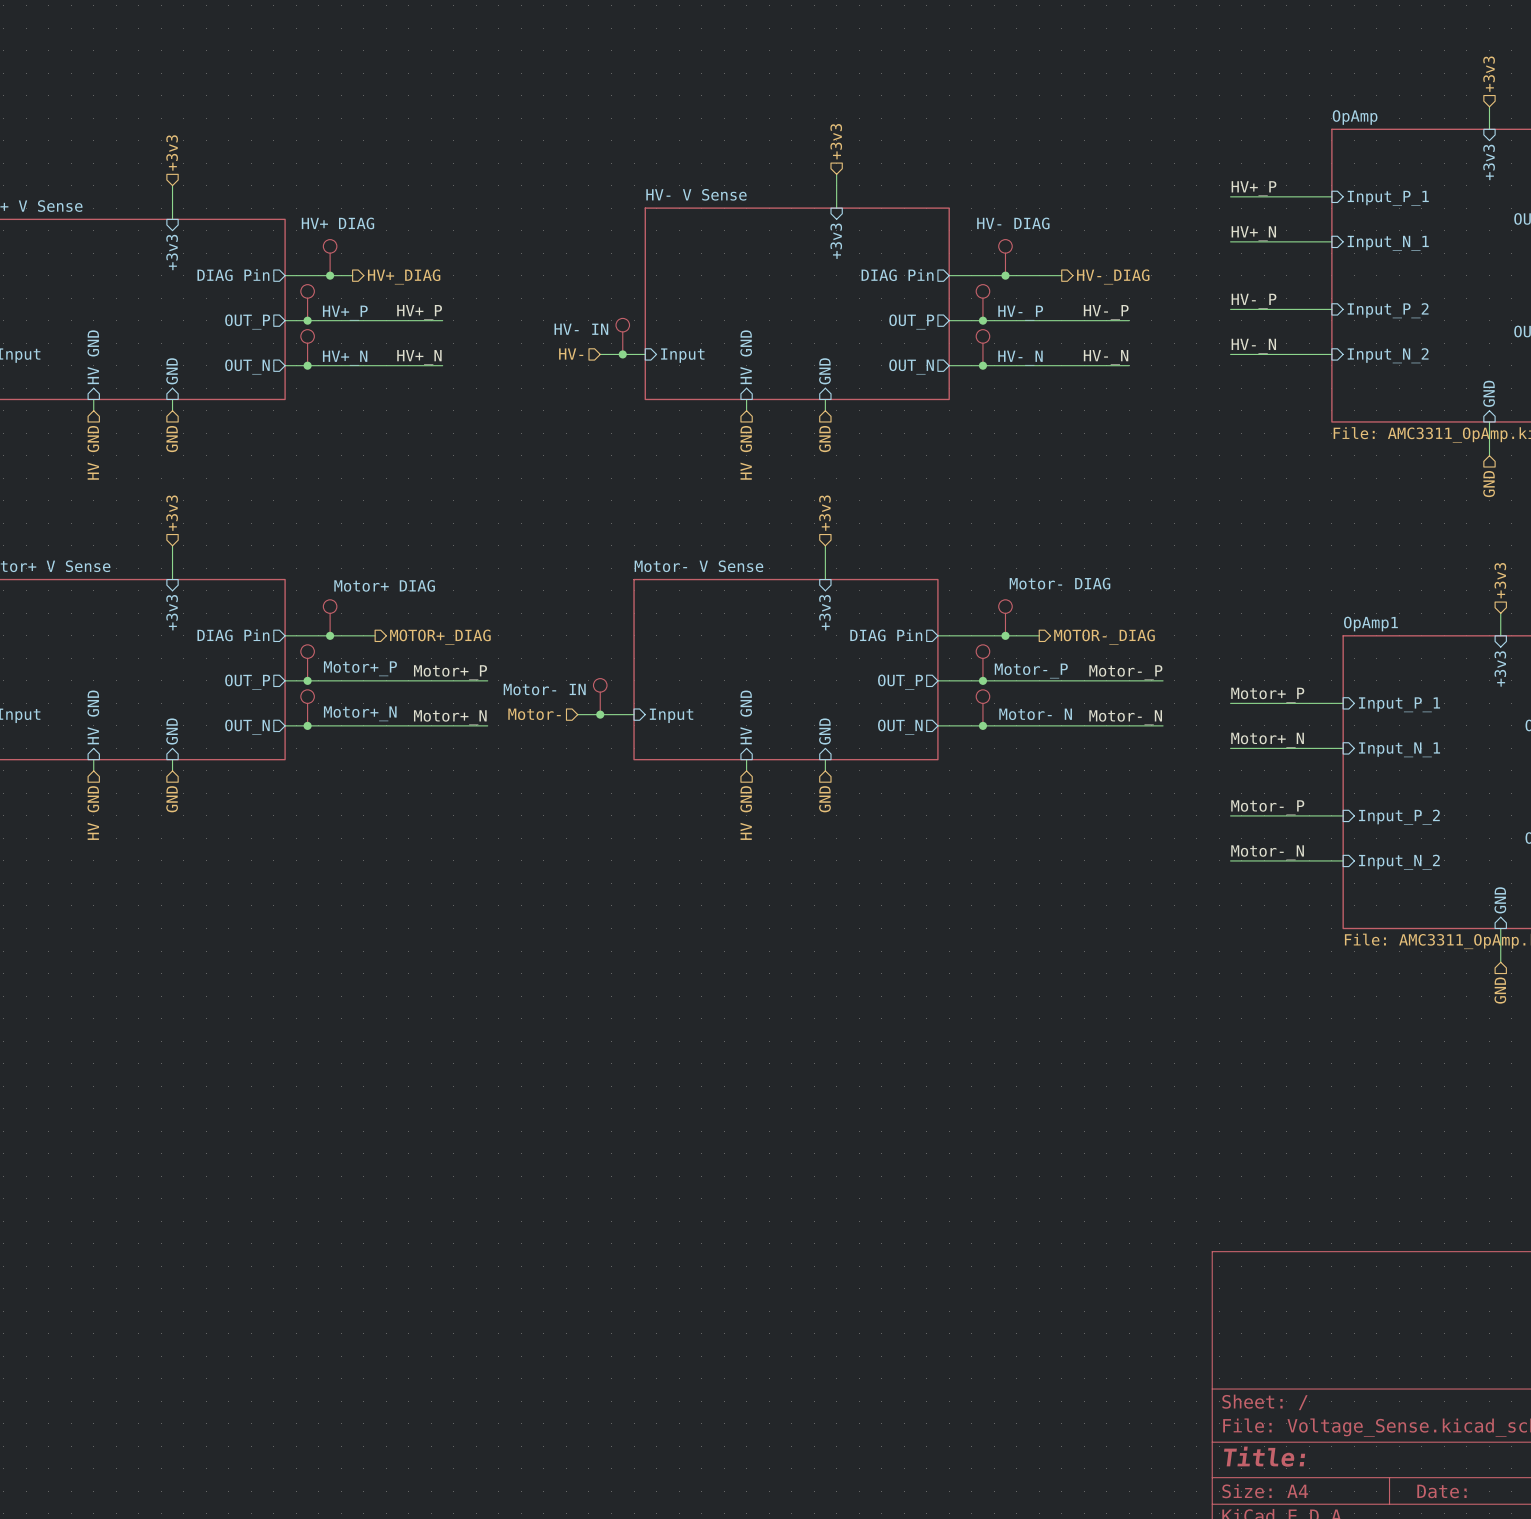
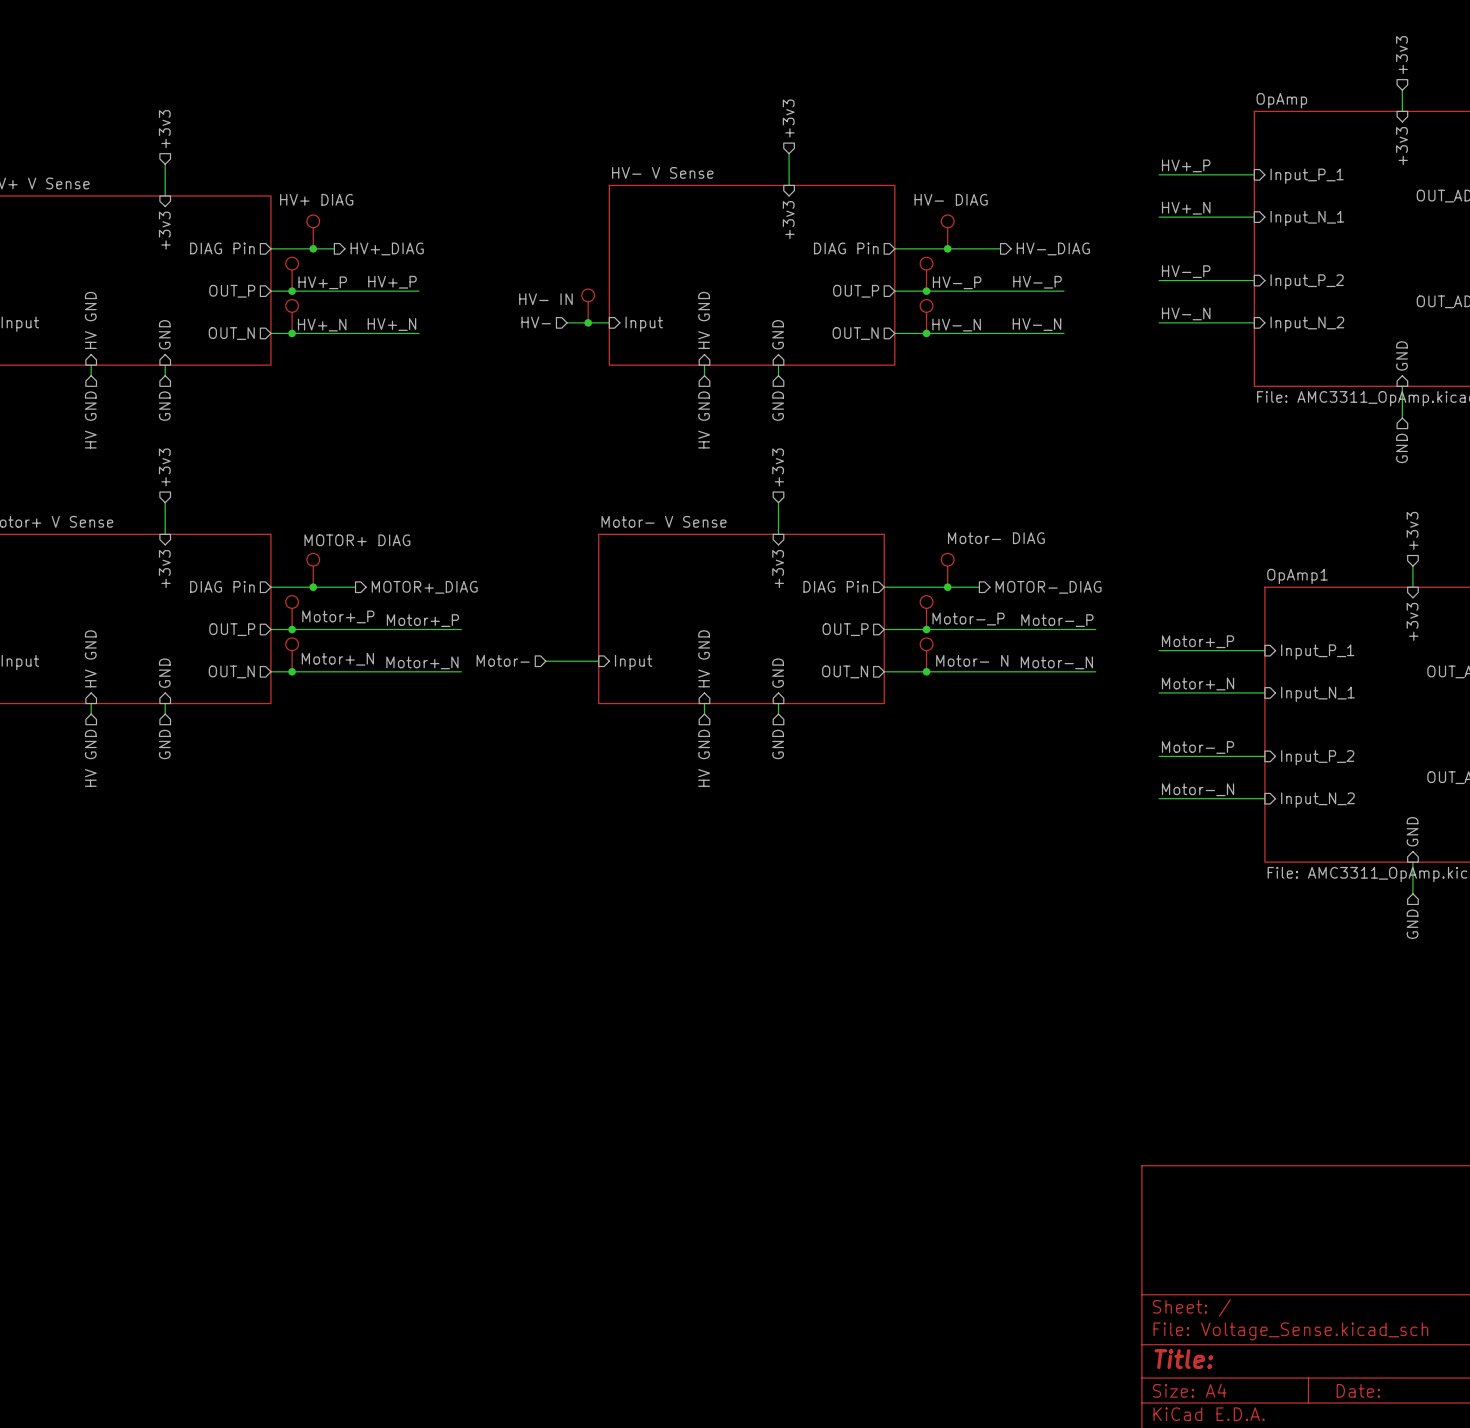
part value: Motor+ DIAG (384, 585) -> MOTOR+ DIAG (357, 540)
part: Motor- IN (600, 696) -> none
junction: (600, 714) -> none

